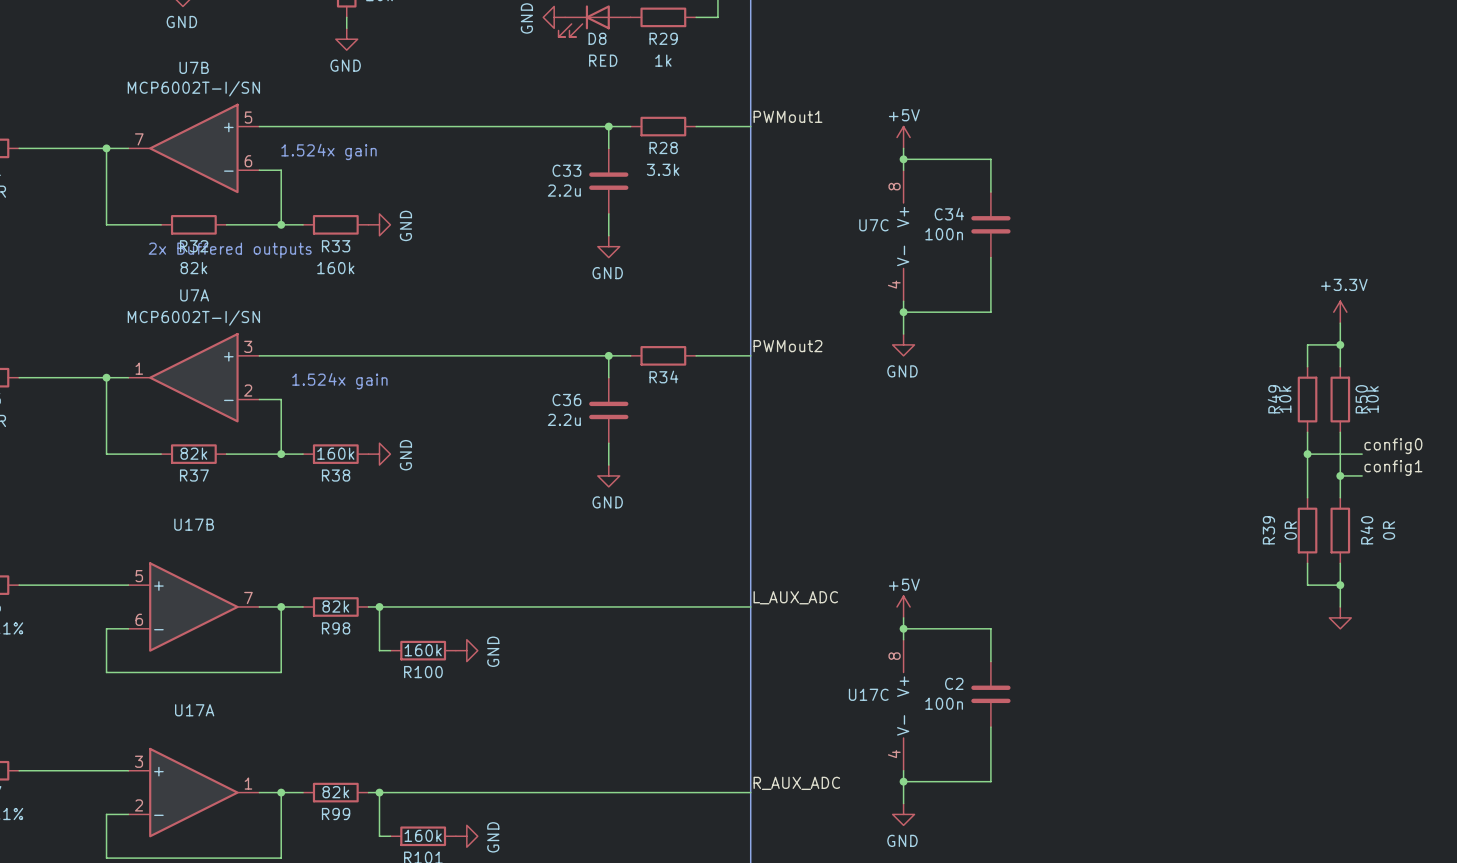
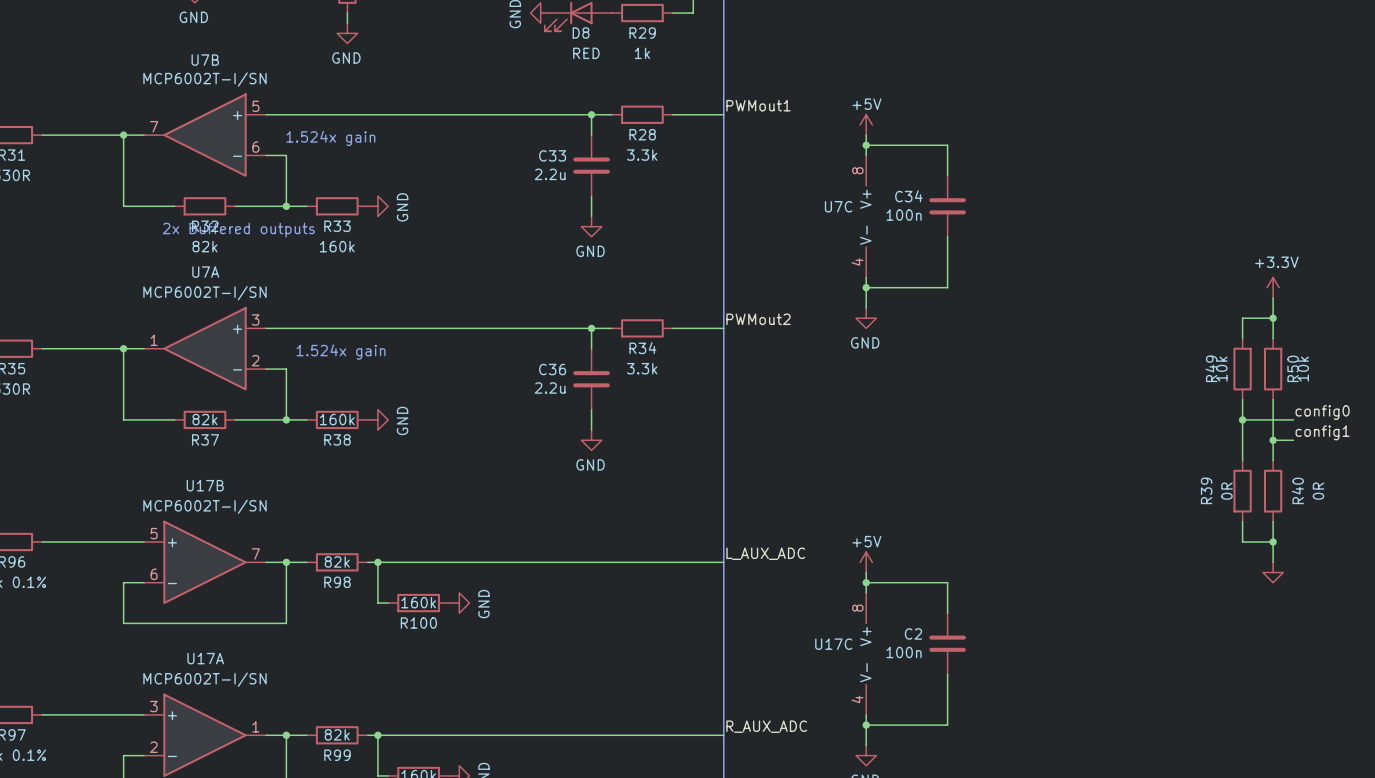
R34 value: none -> 3.3k (642, 368)
U17B value: none -> MCP6002T-I/SN (205, 506)
U17A value: none -> MCP6002T-I/SN (205, 679)

